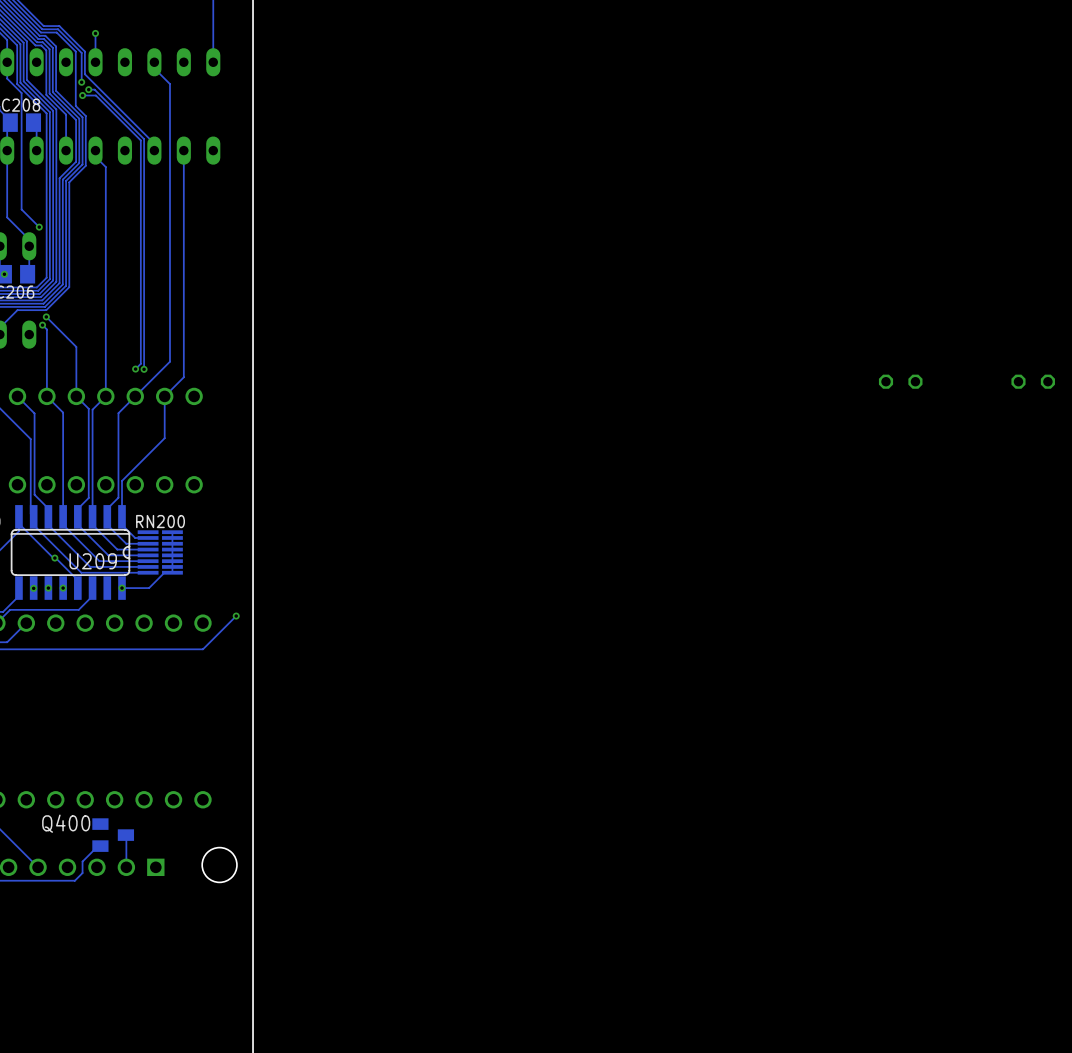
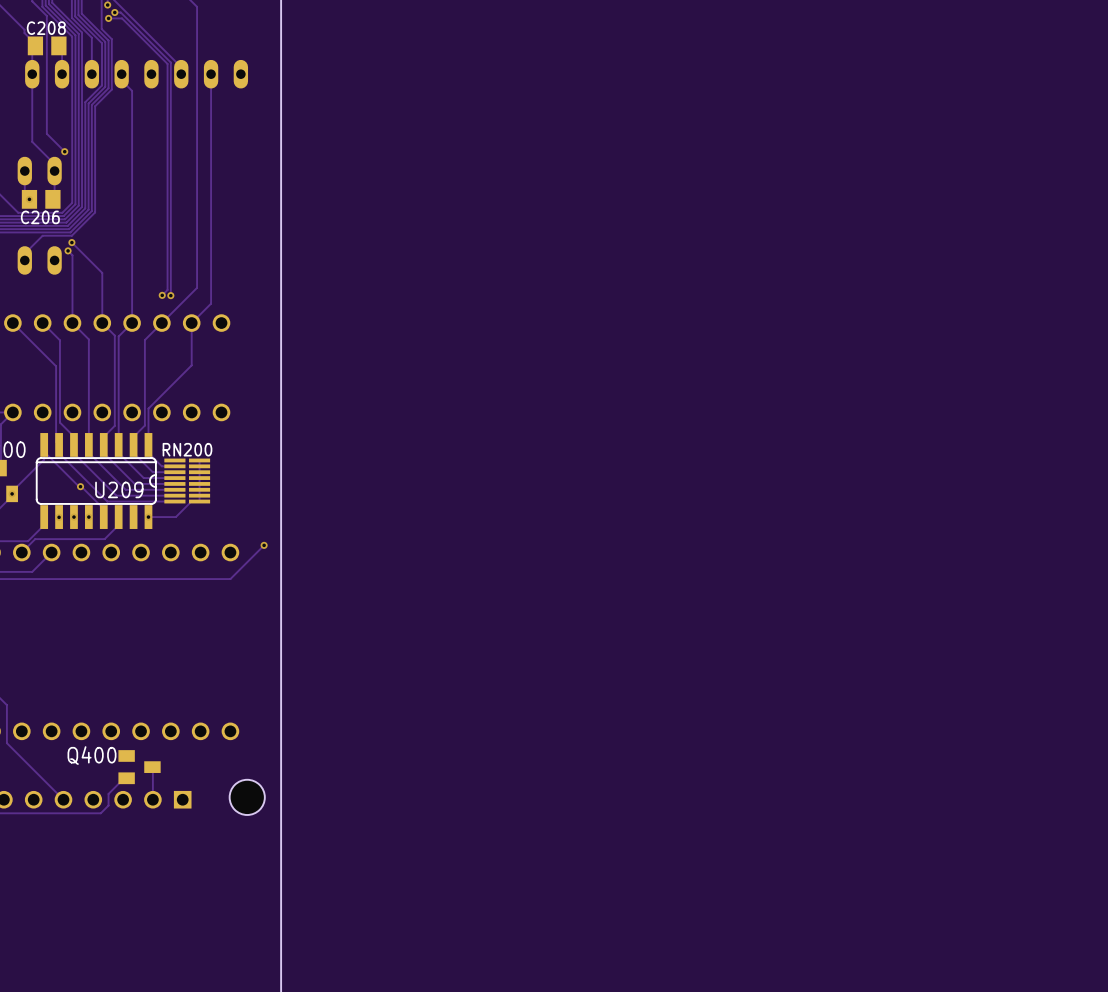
part: (900, 381) -> none
part: (1033, 381) -> none

